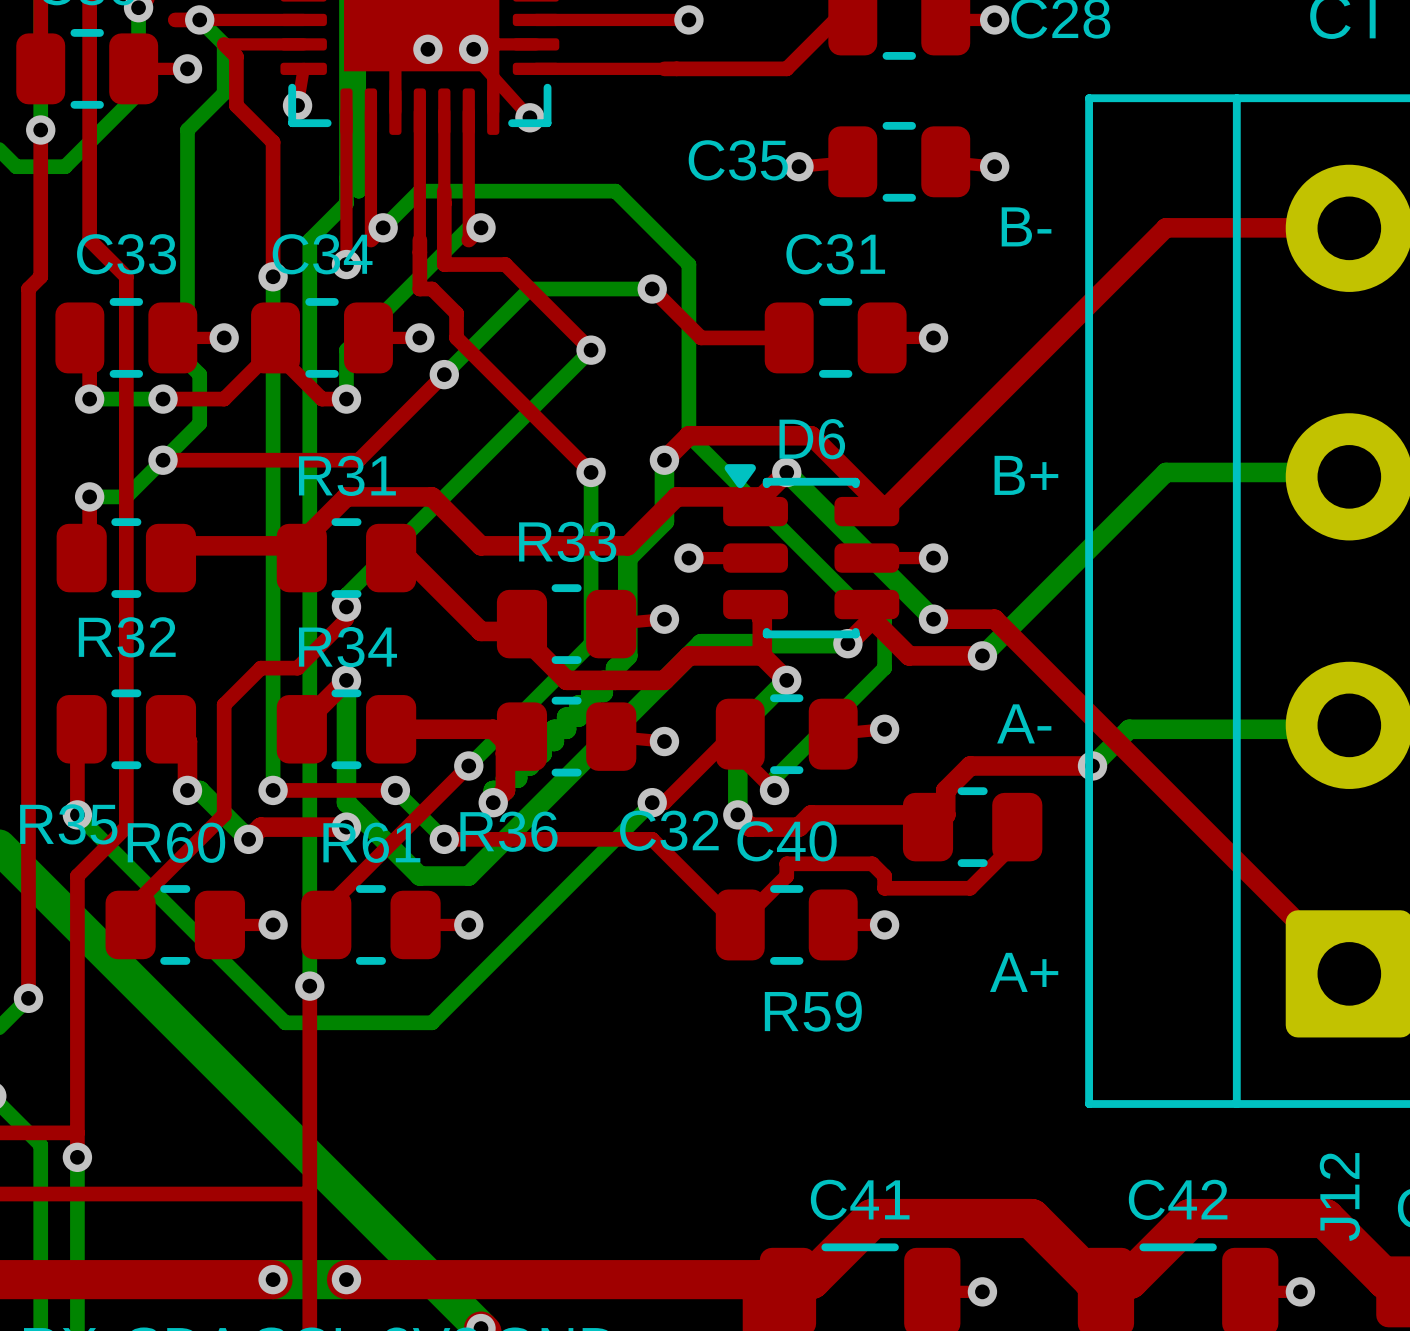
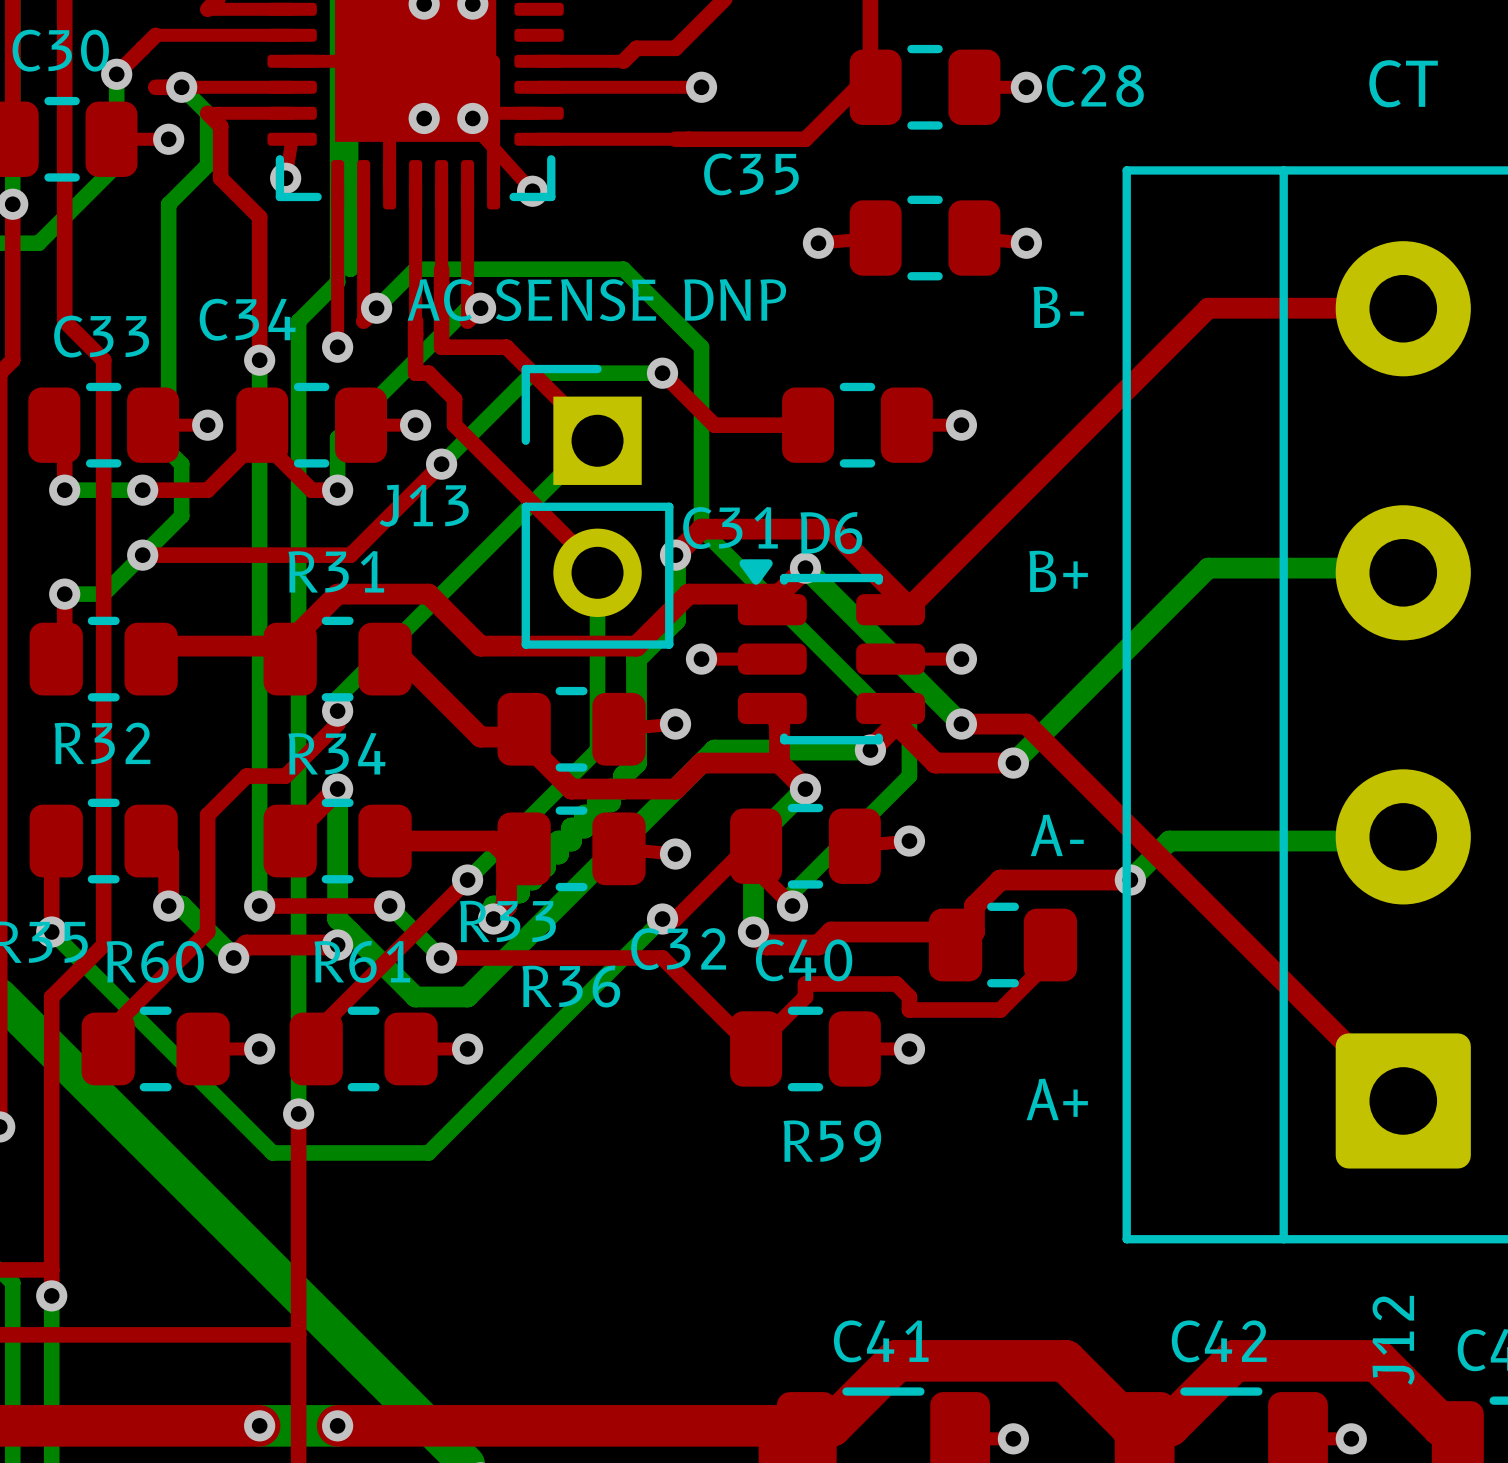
C35 name position: C35 (738, 160) -> C35 (751, 174)
text: none -> AC SENSE DNP (596, 300)
C34 name position: C34 (322, 254) -> C34 (247, 319)
C31 name position: C31 (835, 254) -> C31 (730, 528)
via: (591, 350) -> none
J13: none -> (597, 506)
via: (591, 472) -> none
R33 name position: R33 (567, 541) -> R33 (507, 921)
R36 name position: R36 (508, 831) -> R36 (571, 986)

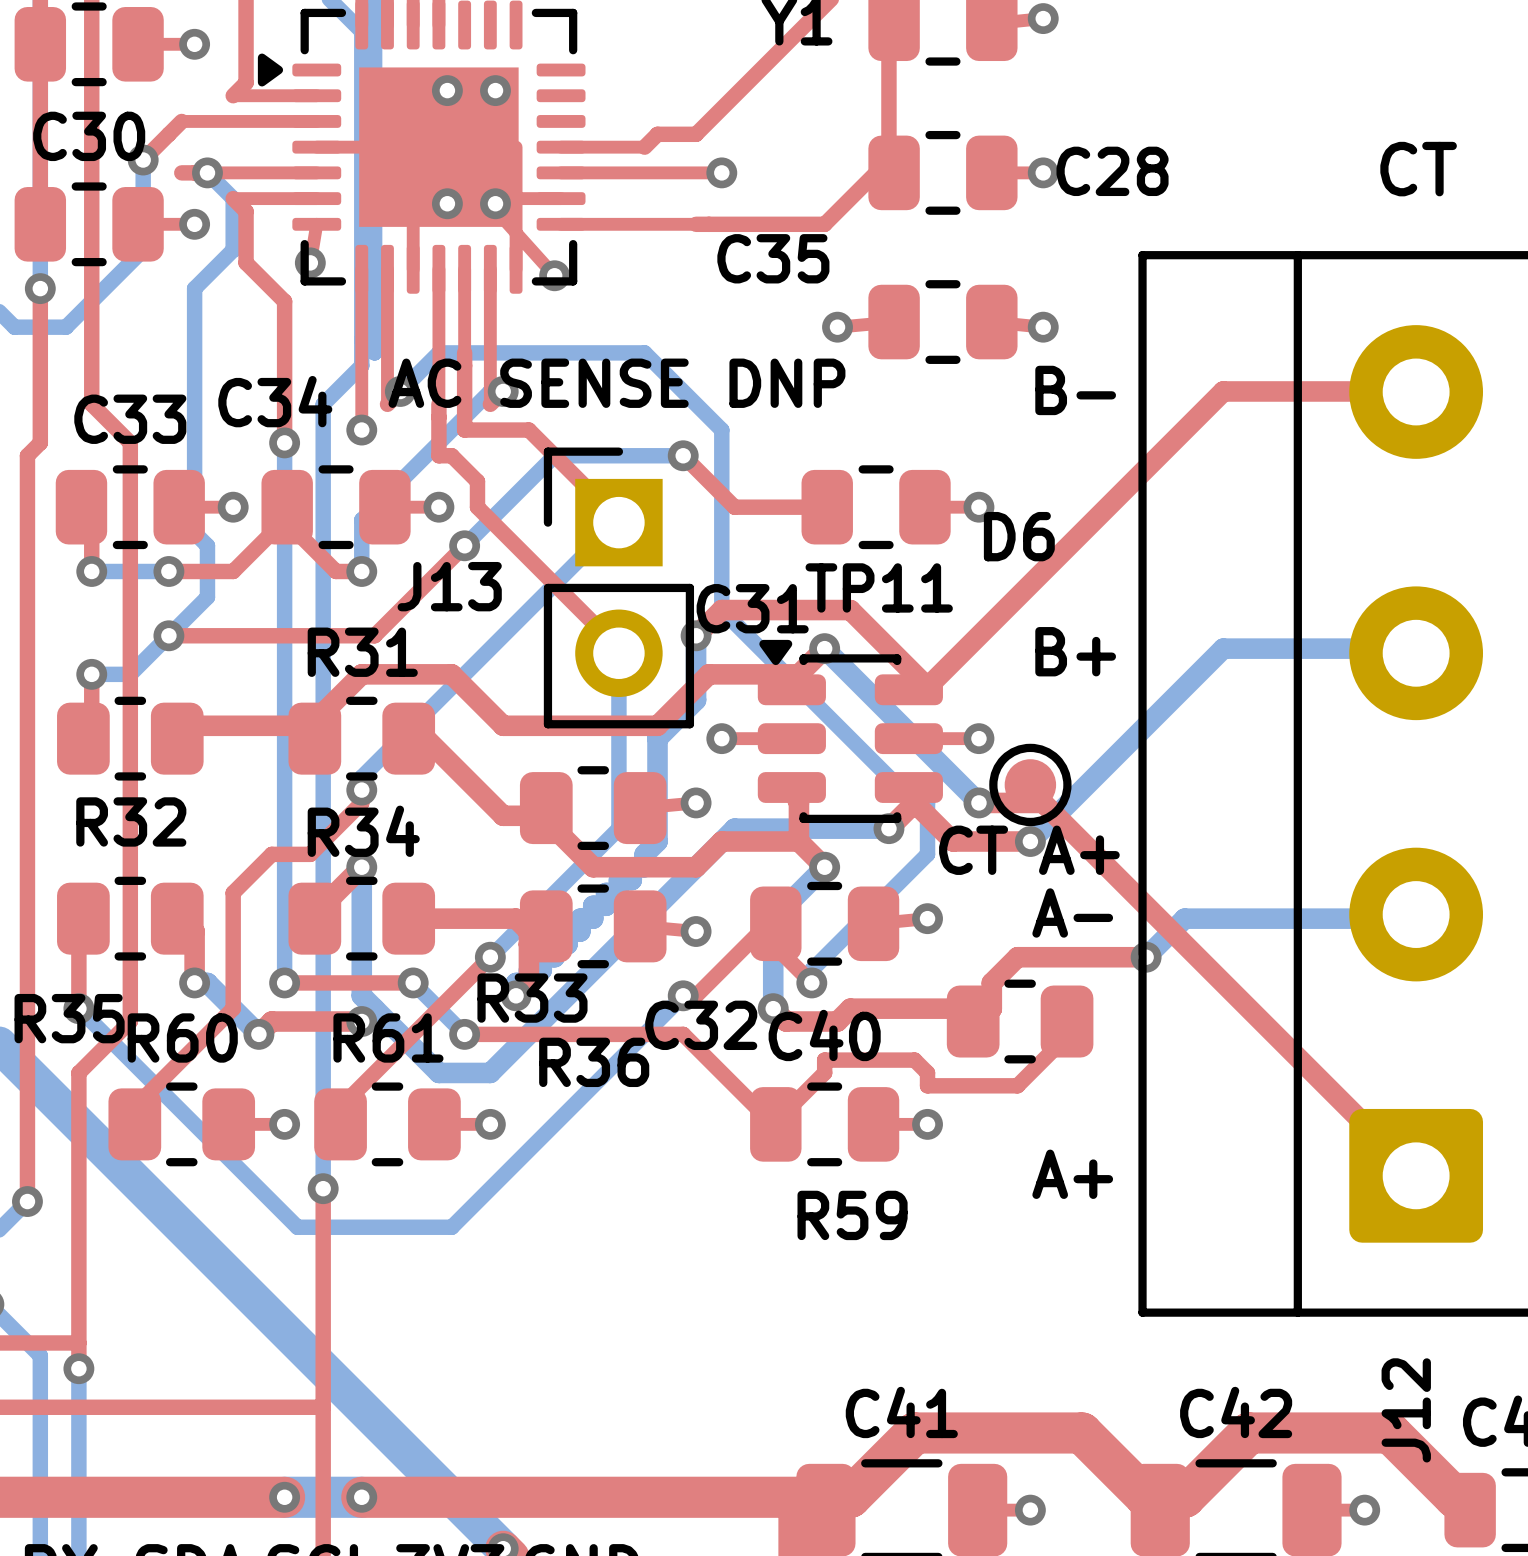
D6 name position: D6 (831, 533) -> D6 (1019, 536)
TP11: none -> (1030, 784)
text: none -> CT A+ (1029, 850)

